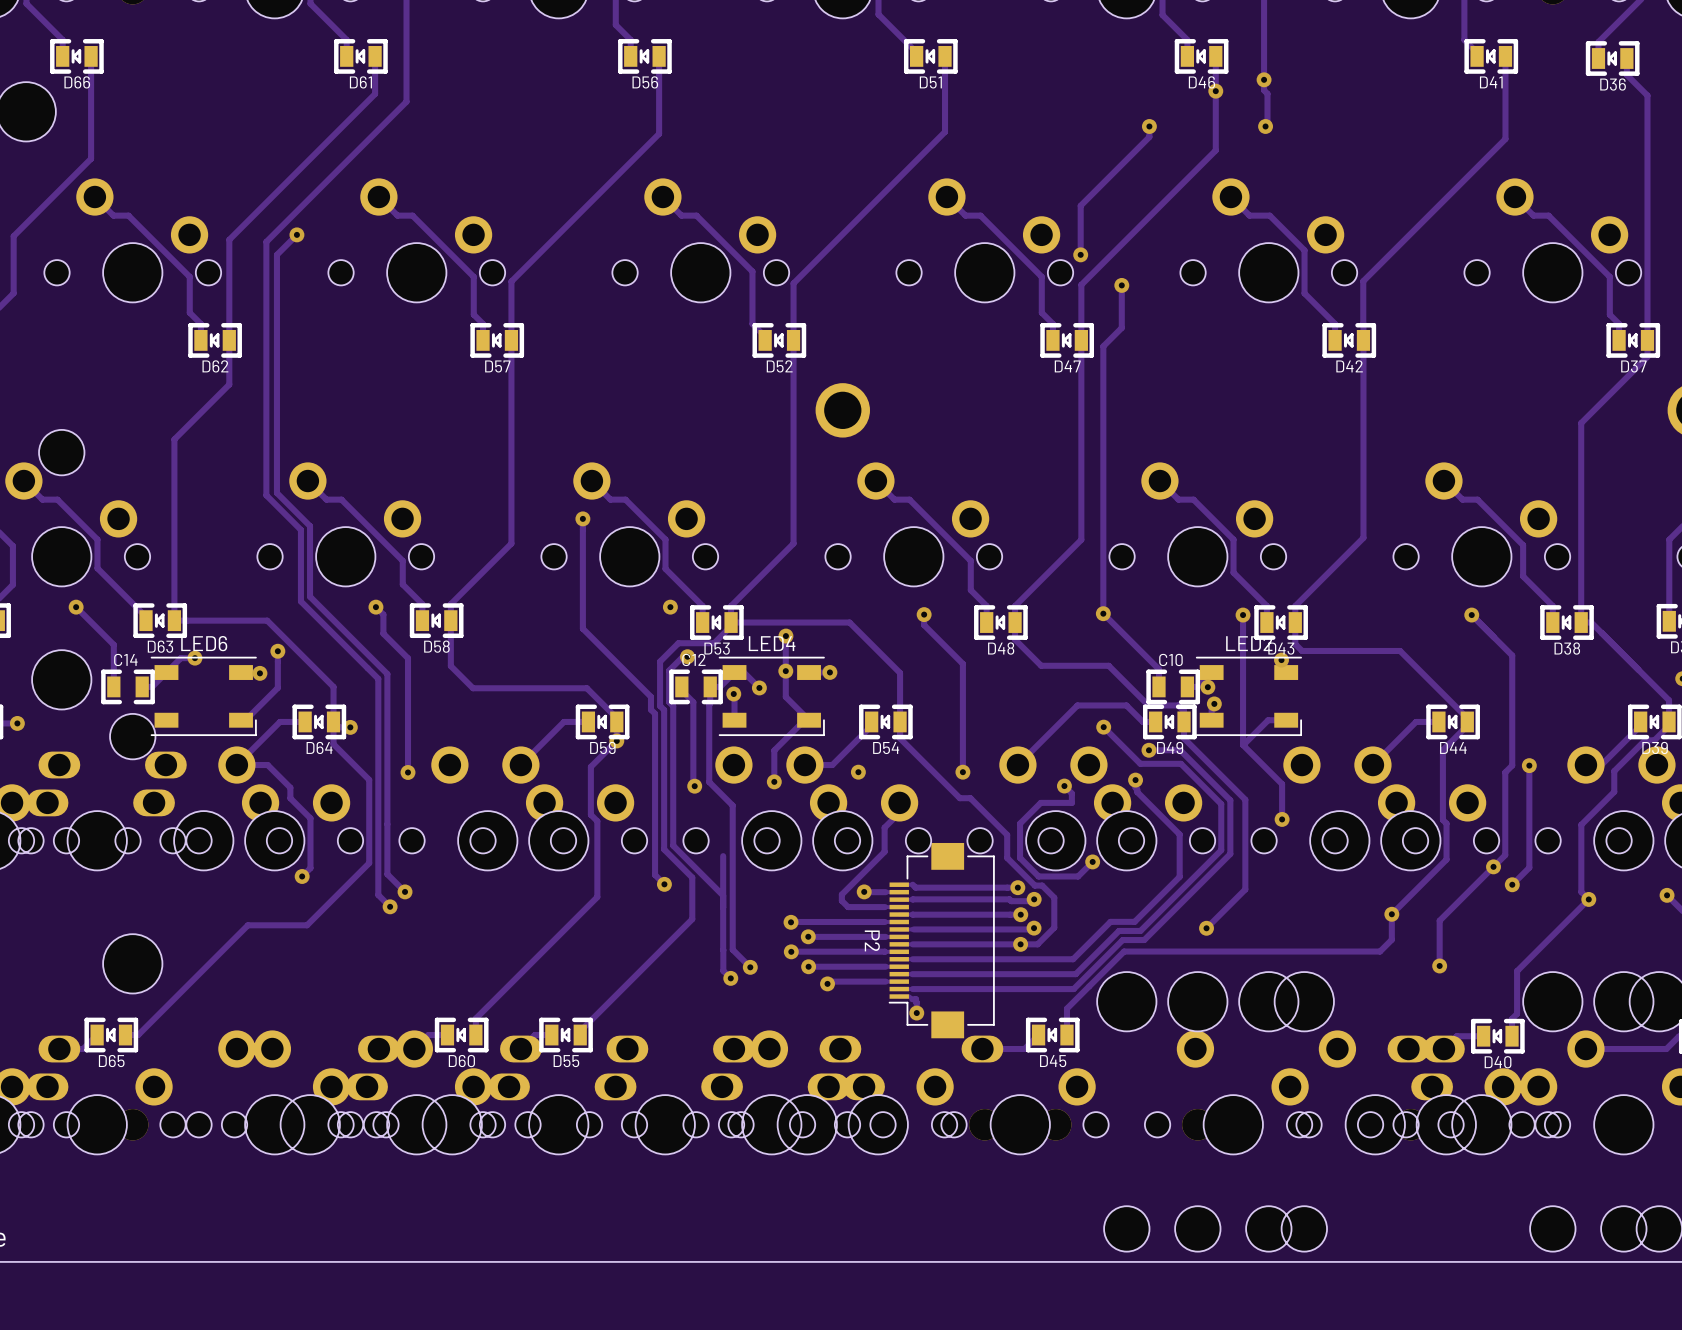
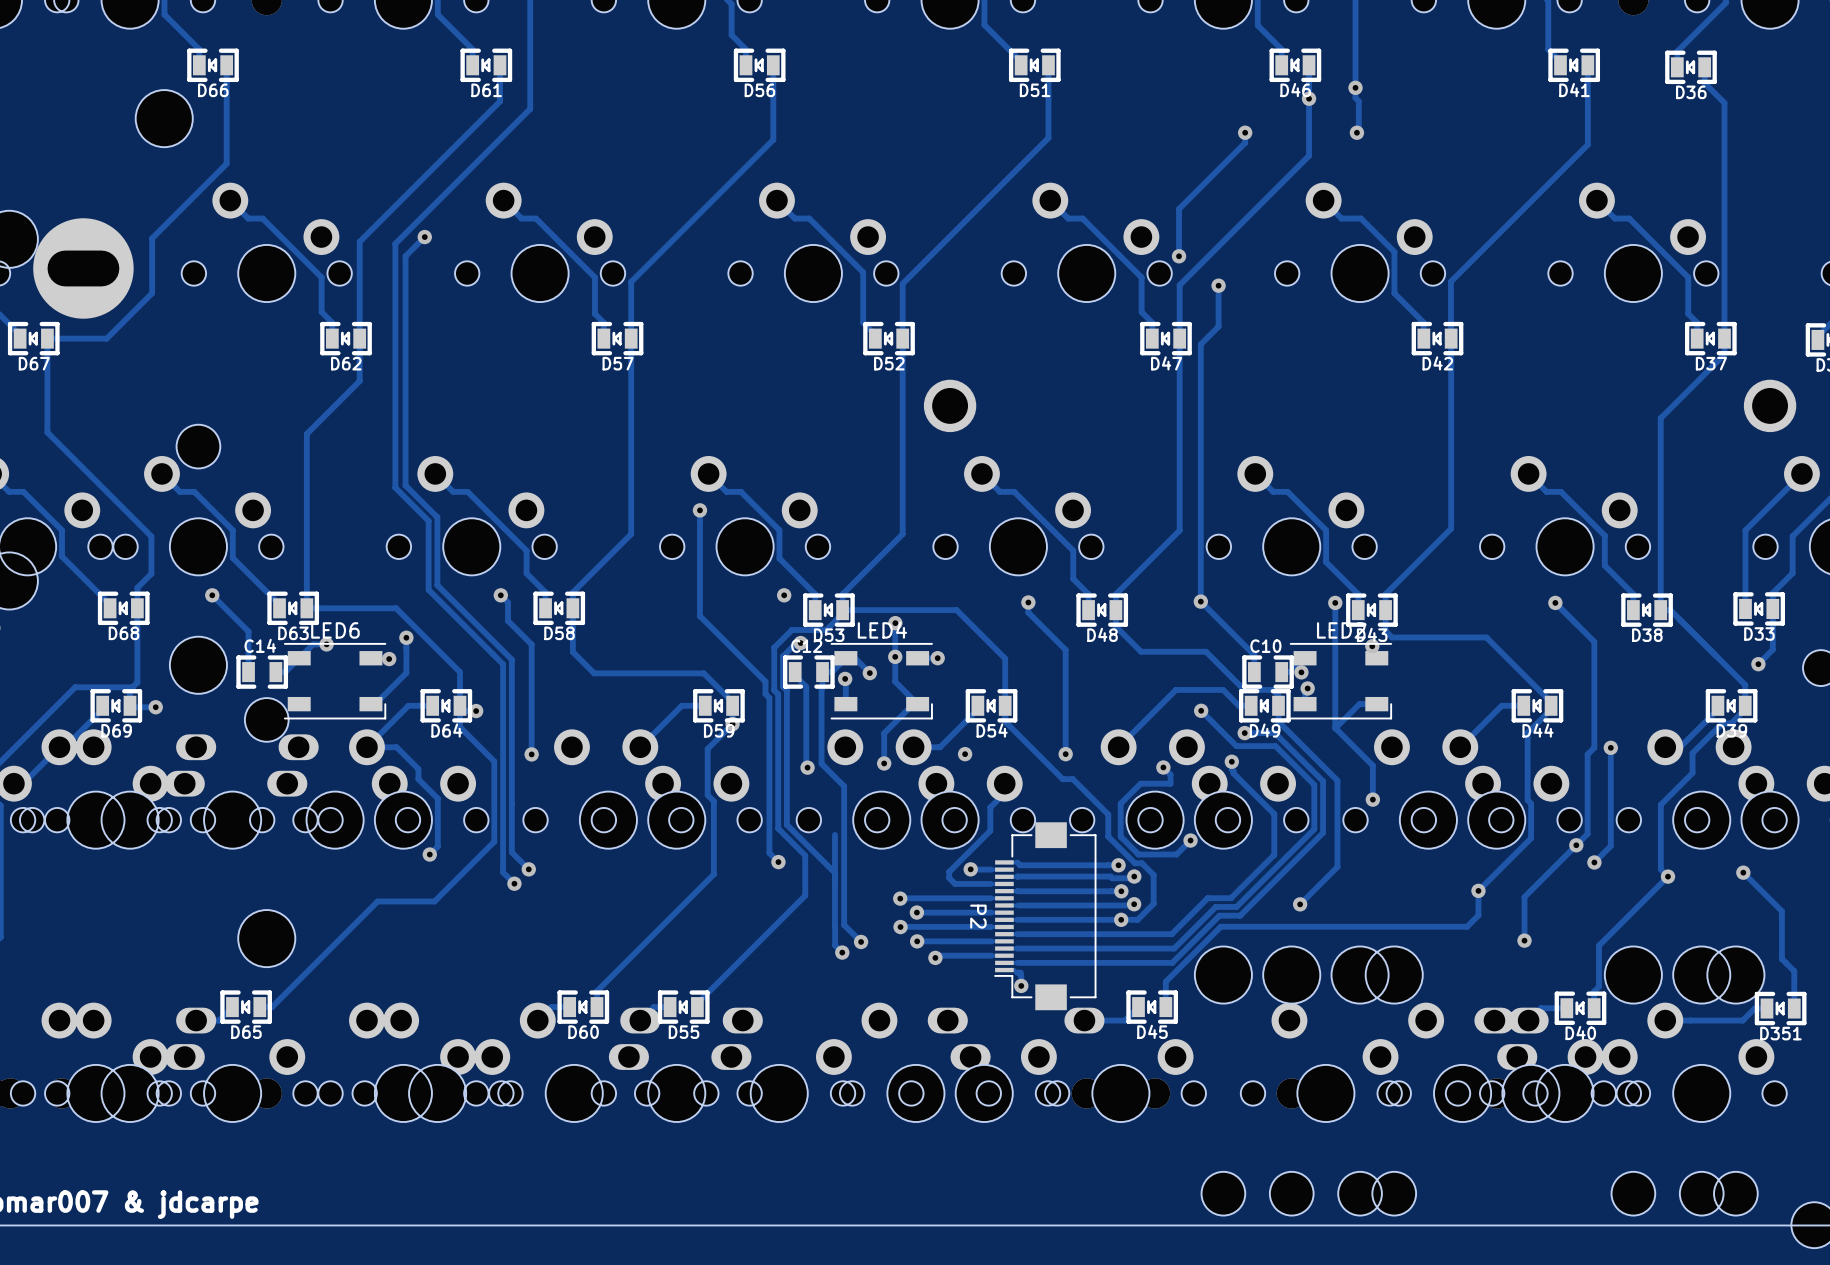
part footprint: [221, 1030, 399, 1155] -> [352, 1002, 523, 1123]
part footprint: [576, 1035, 754, 1155] -> [694, 1007, 865, 1123]
part: (416, 1095) -> none
part: (771, 1095) -> none

